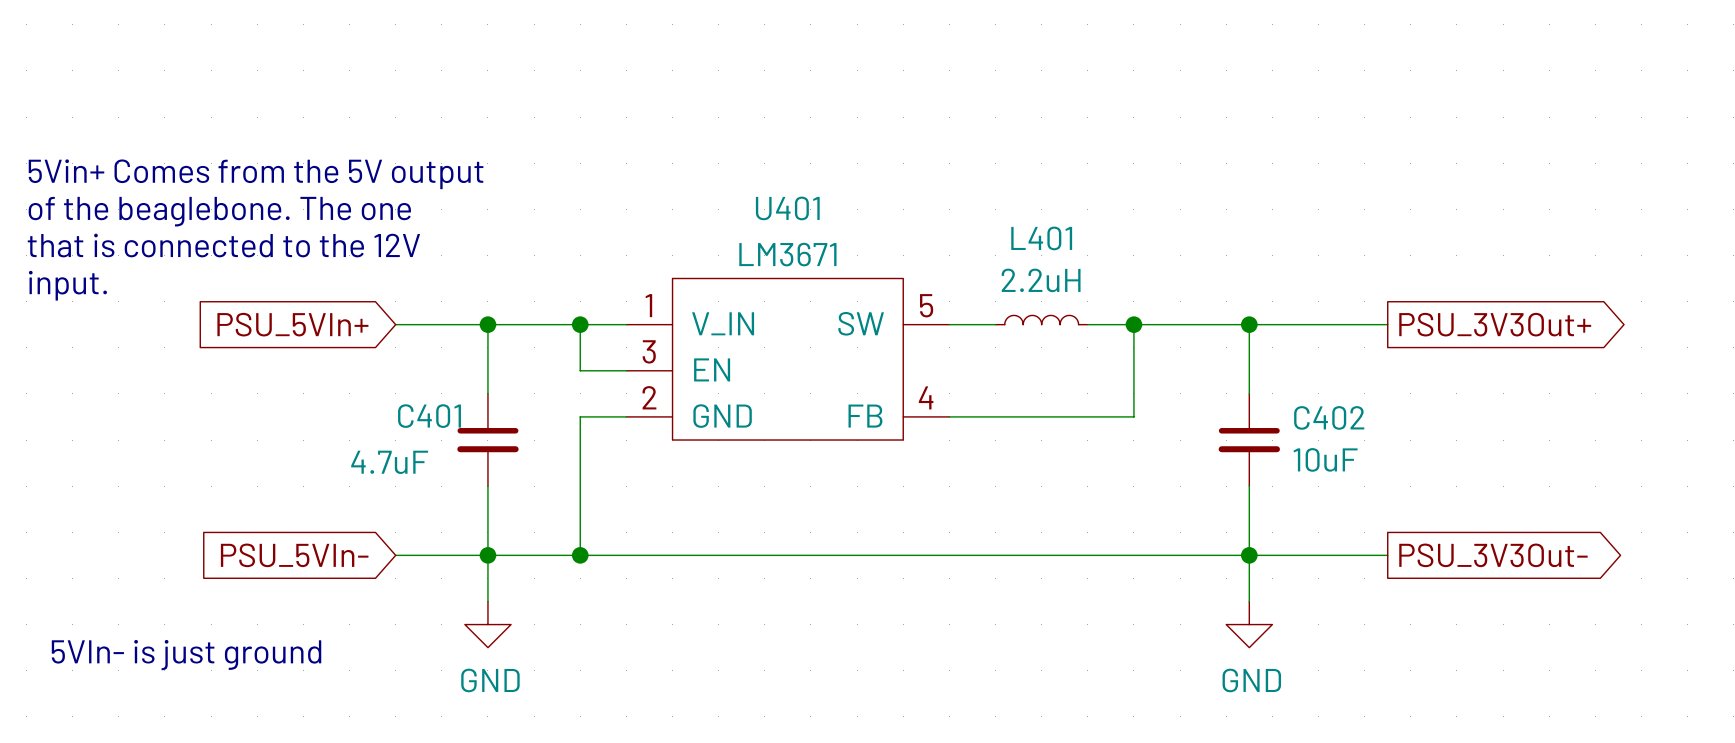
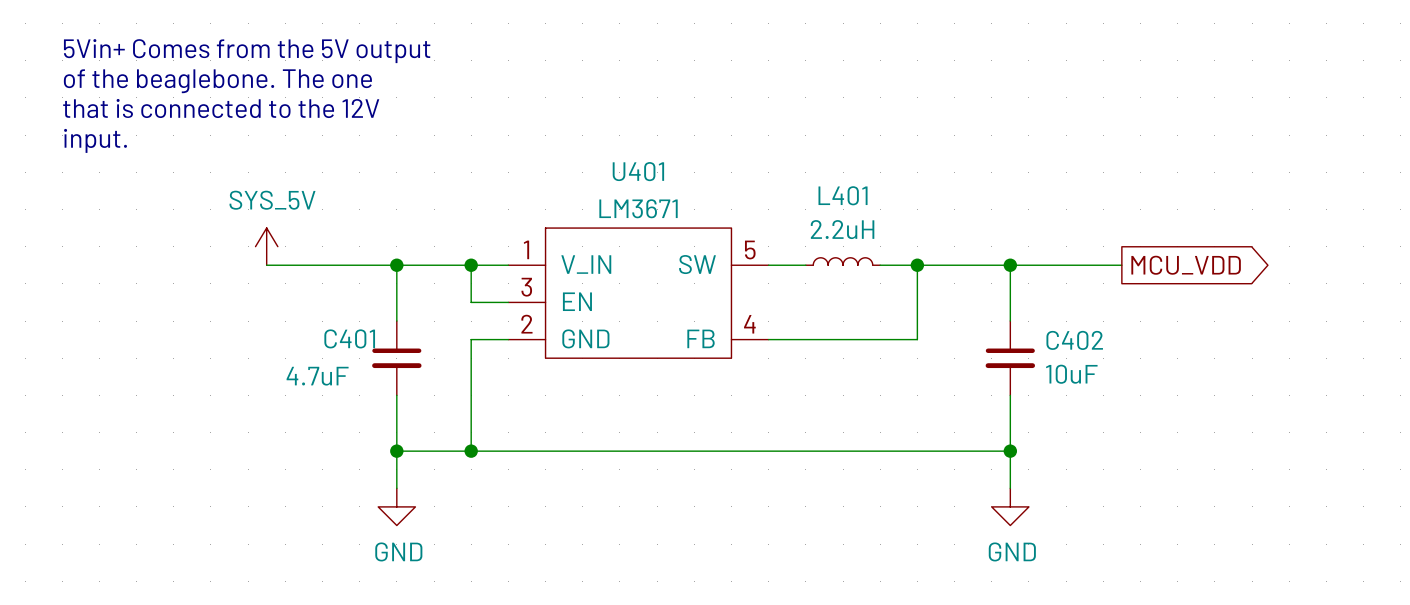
text position: 5Vin+ Comes from the 5V output (256, 174) -> 5Vin+ Comes from the 5V output (247, 51)
text position: of the beaglebone. The one (219, 211) -> of the beaglebone. The one (217, 81)
text position: that is connected to the 12V (223, 245) -> that is connected to the 12V (221, 108)
text position: input. (67, 285) -> input. (95, 140)
power symbol: none -> SYS_5V (266, 246)
global label: PSU_5VIn+ (292, 324) -> none
wire: none -> (266, 265) (322, 265)
global label: PSU_3V3Out+ (1495, 324) -> MCU_VDD (1186, 265)
global label: PSU_5VIn- (294, 555) -> none
wire: (395, 555) (487, 555) -> none
wire: (1249, 555) (1387, 555) -> none
global label: PSU_3V3Out- (1493, 555) -> none
text: 5VIn- is just ground (186, 655) -> none

